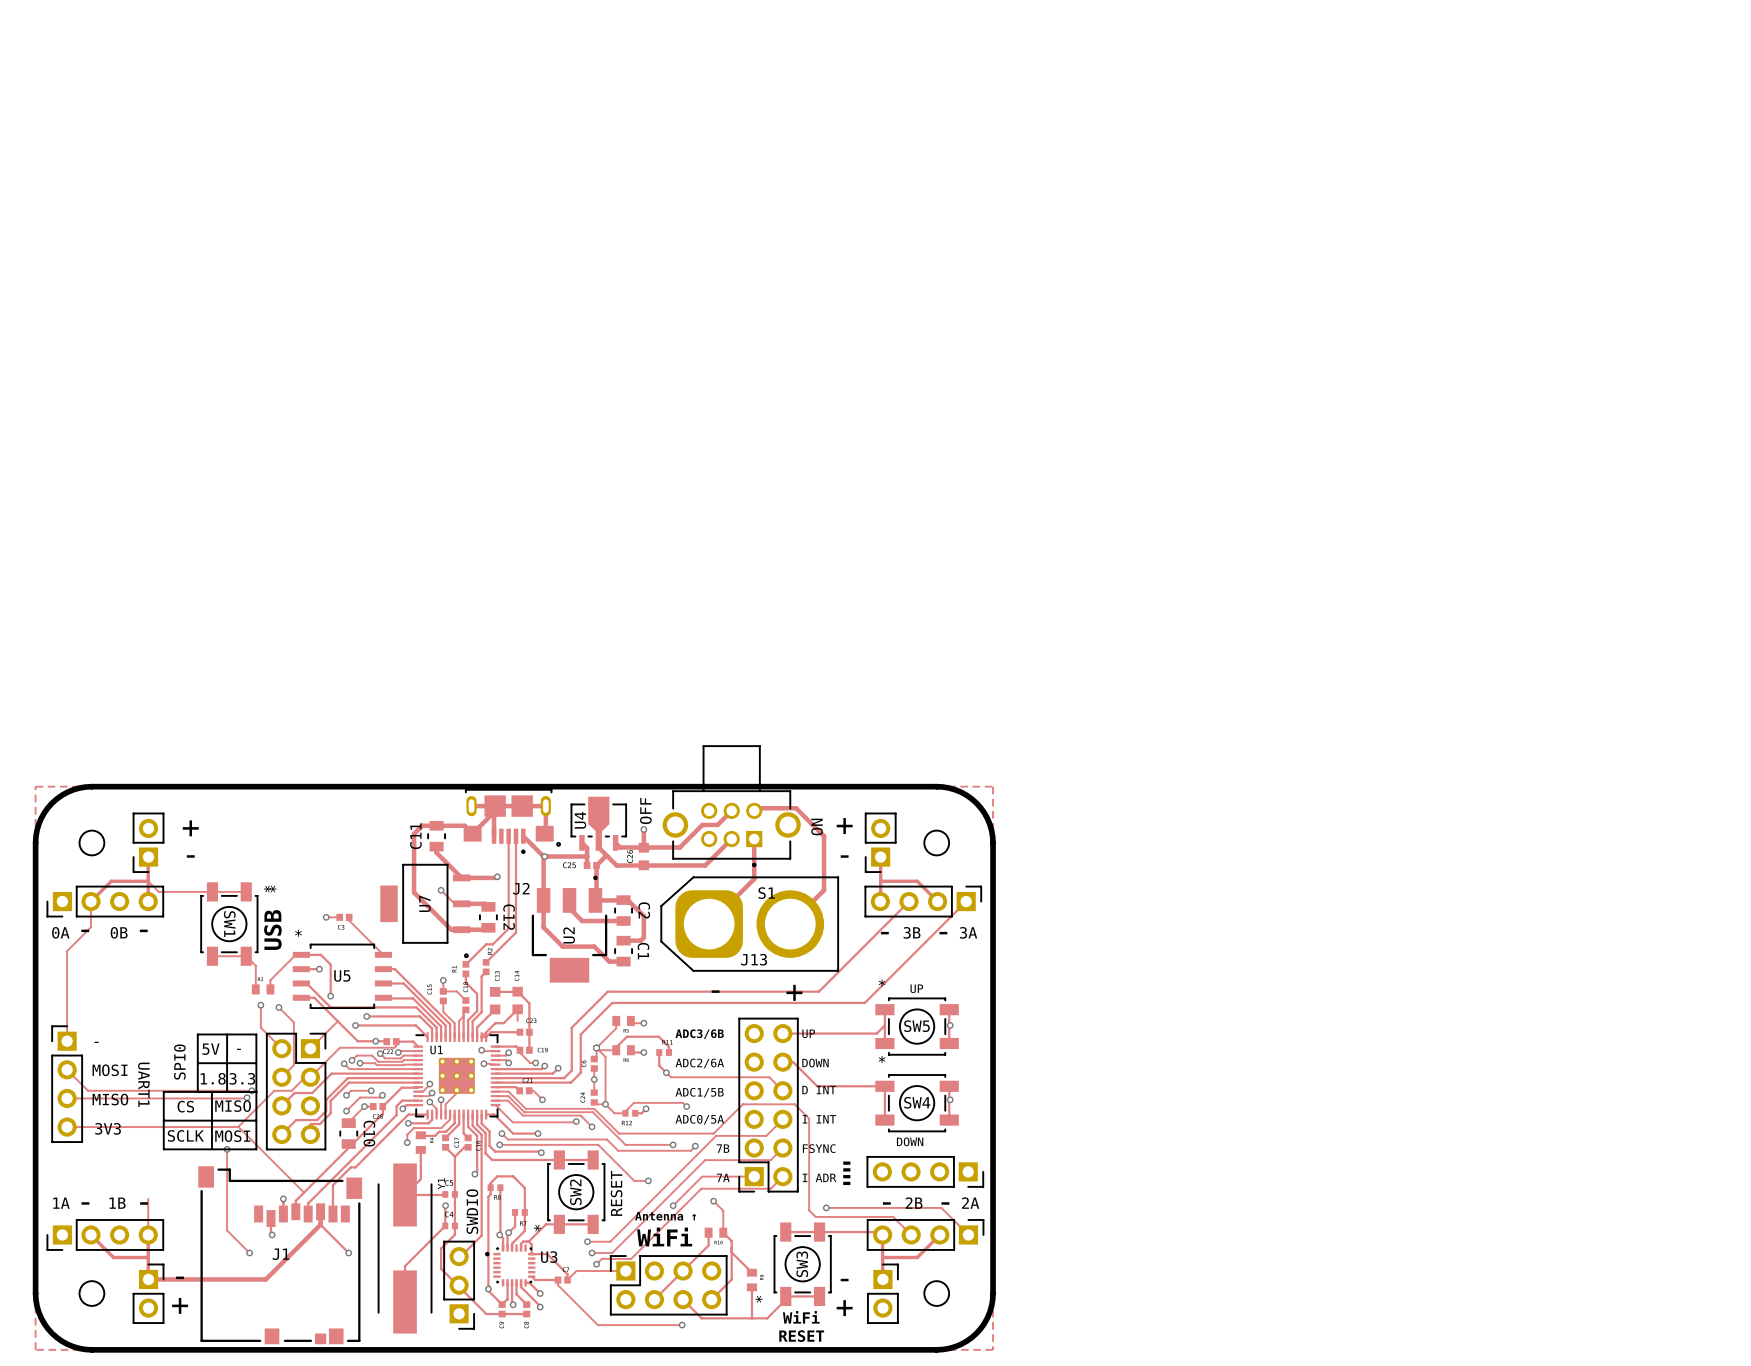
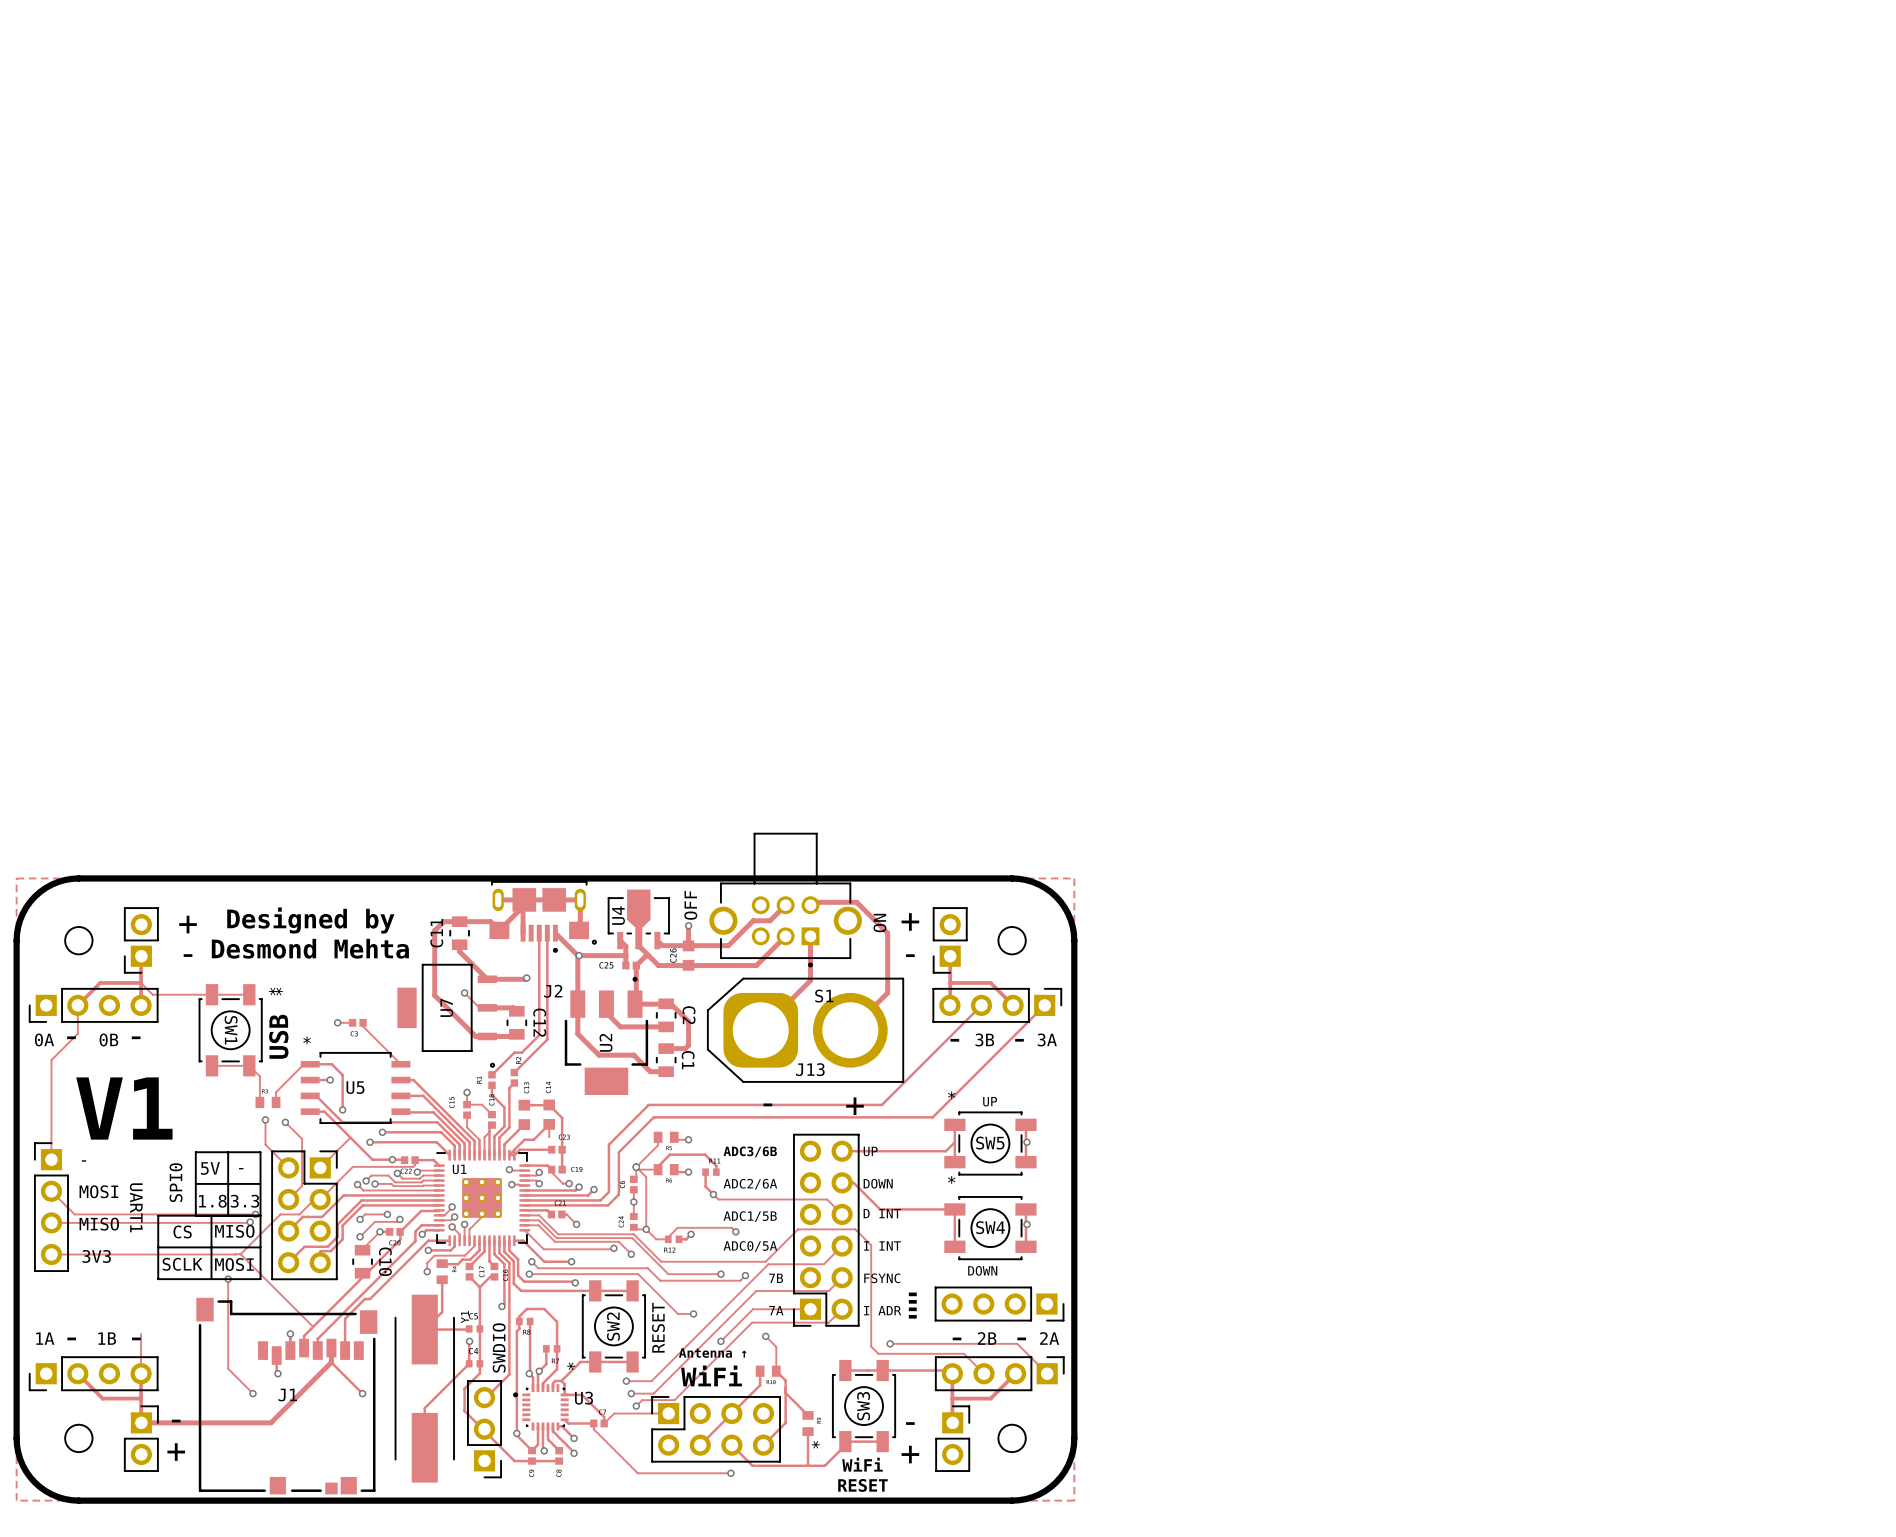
text: none -> Designed by (310, 920)
text: none -> Desmond Mehta (310, 948)
text: none -> V1 (124, 1108)

